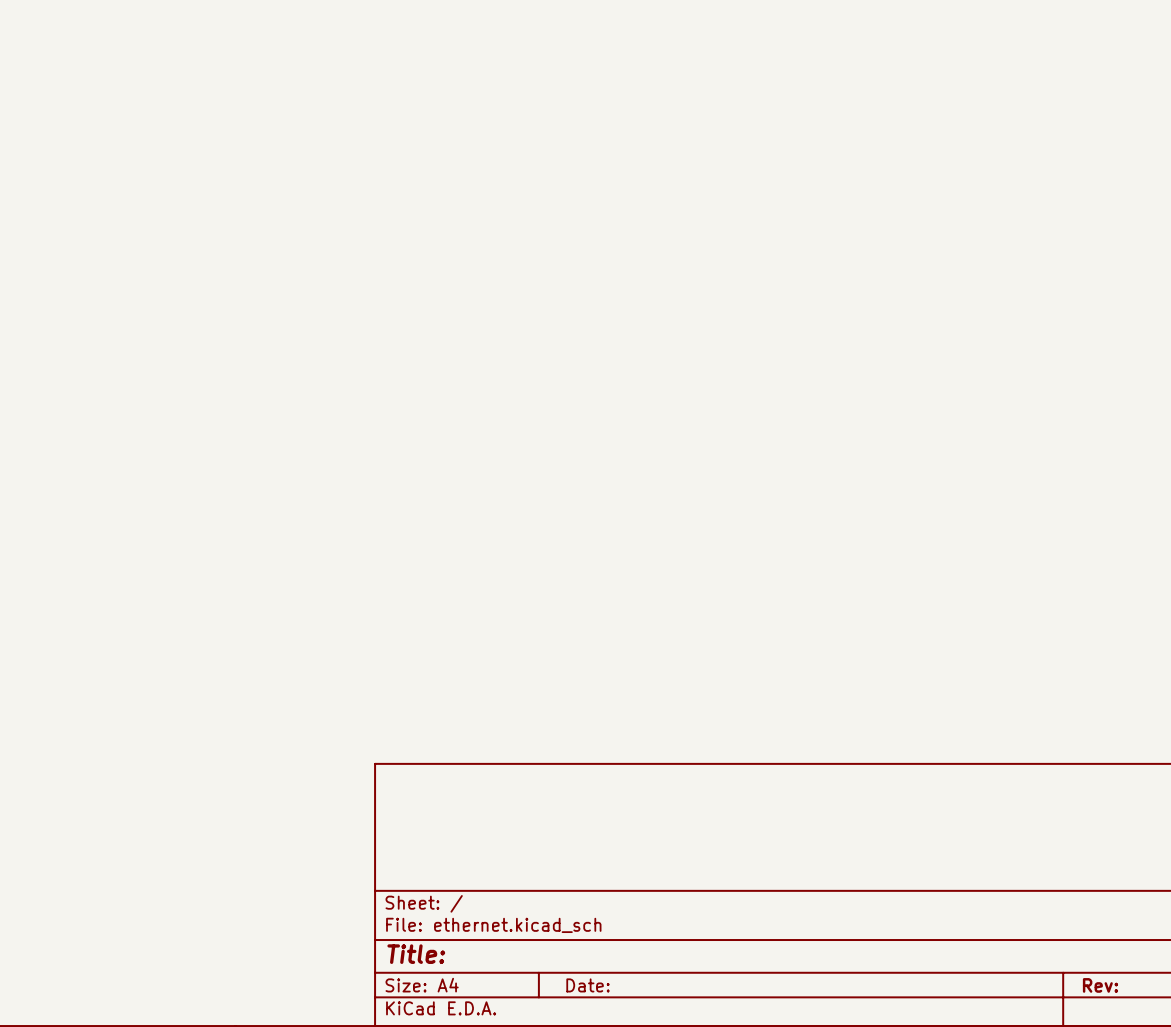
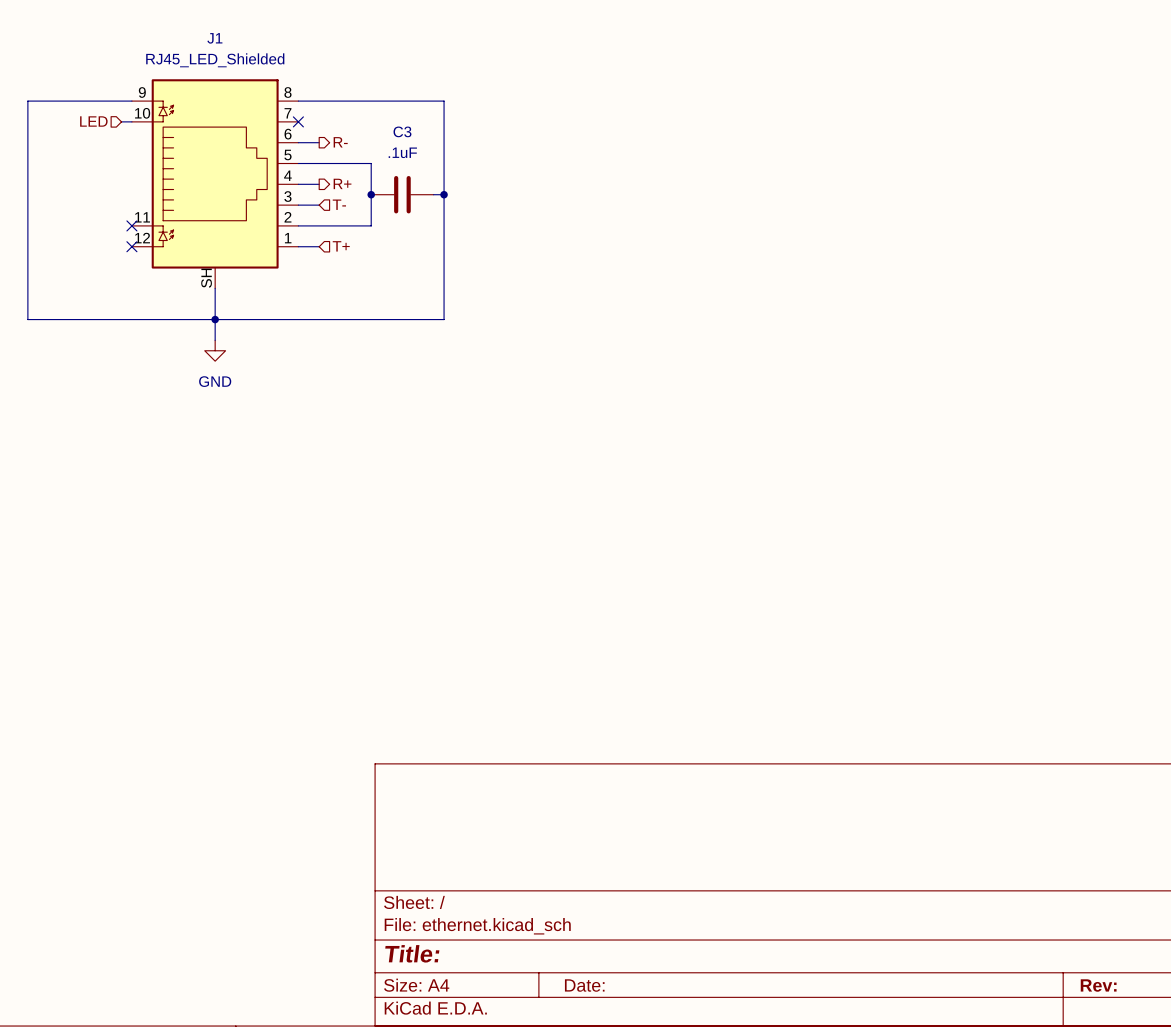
wire: none -> (131, 101) (27, 101) (27, 319) (444, 319) (444, 101) (298, 101)
hierarchical label: none -> LED (93, 121)
wire: none -> (121, 121) (131, 121)
no-connect mark: none -> (298, 121)
wire: none -> (298, 142) (319, 142)
hierarchical label: none -> R- (340, 142)
wire: none -> (298, 163) (371, 163) (371, 225) (298, 225)
J1: none -> RJ45_LED_Shielded (215, 183)
hierarchical label: none -> R+ (342, 183)
wire: none -> (298, 184) (319, 184)
junction: none -> (371, 194)
C3: none -> .1uF (402, 194)
wire: none -> (433, 194) (444, 194)
junction: none -> (444, 194)
hierarchical label: none -> T- (339, 204)
wire: none -> (298, 205) (319, 205)
no-connect mark: none -> (131, 225)
no-connect mark: none -> (131, 246)
wire: none -> (298, 246) (319, 246)
hierarchical label: none -> T+ (341, 246)
wire: none -> (215, 288) (215, 340)
junction: none -> (215, 319)
power symbol: none -> GND (215, 350)

